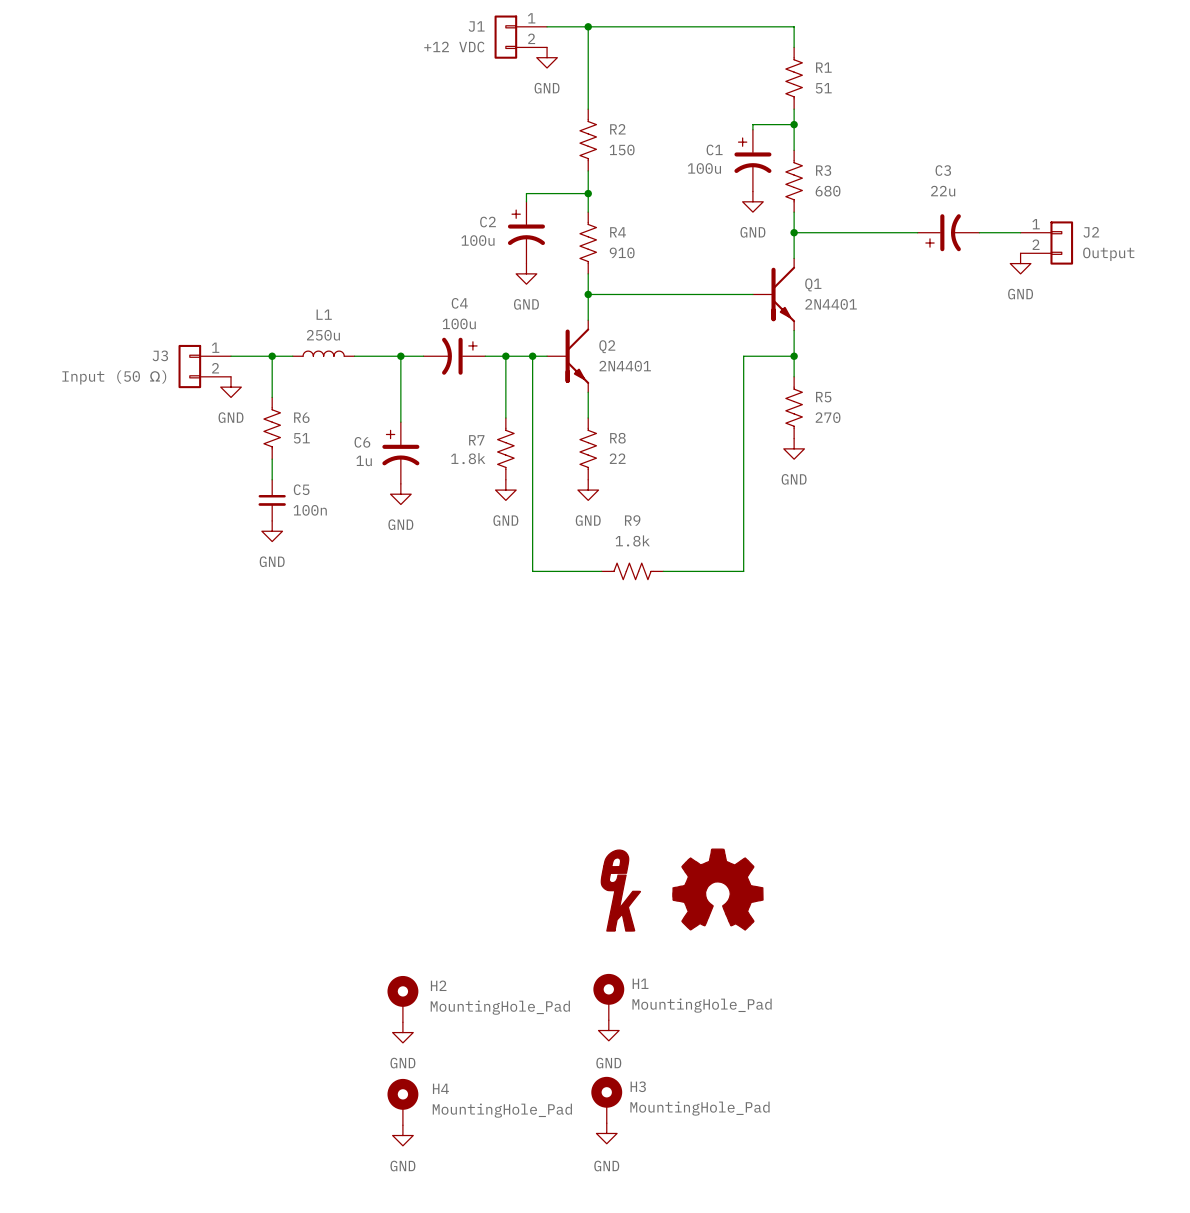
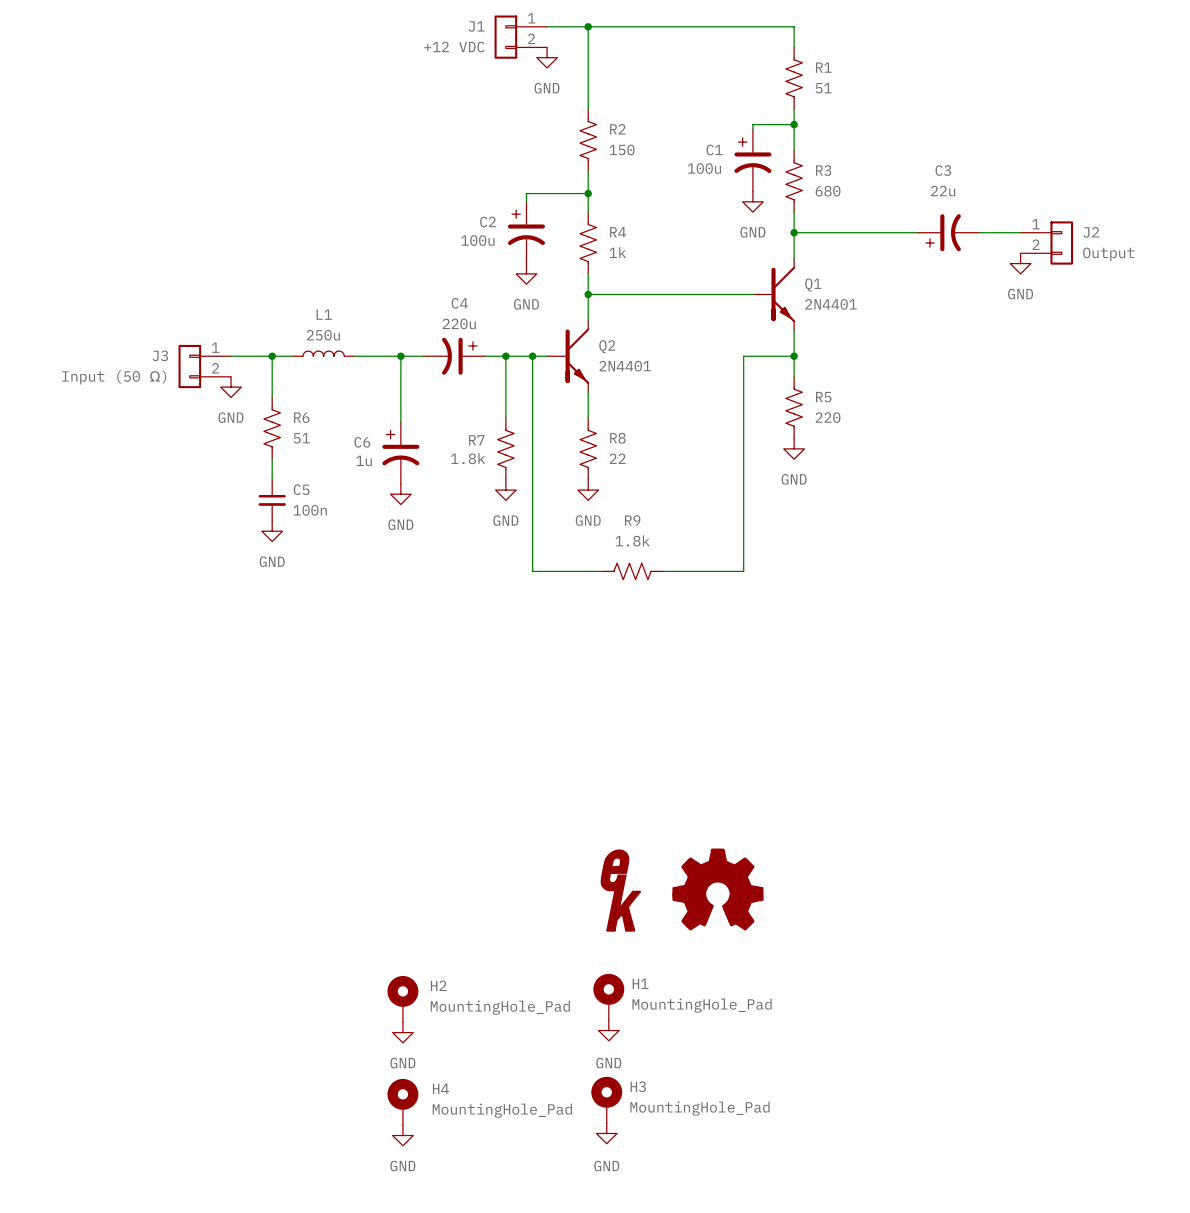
R4 value: 910 (622, 252) -> 1k (617, 252)
C4 value: 100u (459, 323) -> 220u (459, 323)
R5 value: 270 (828, 417) -> 220 (828, 417)

